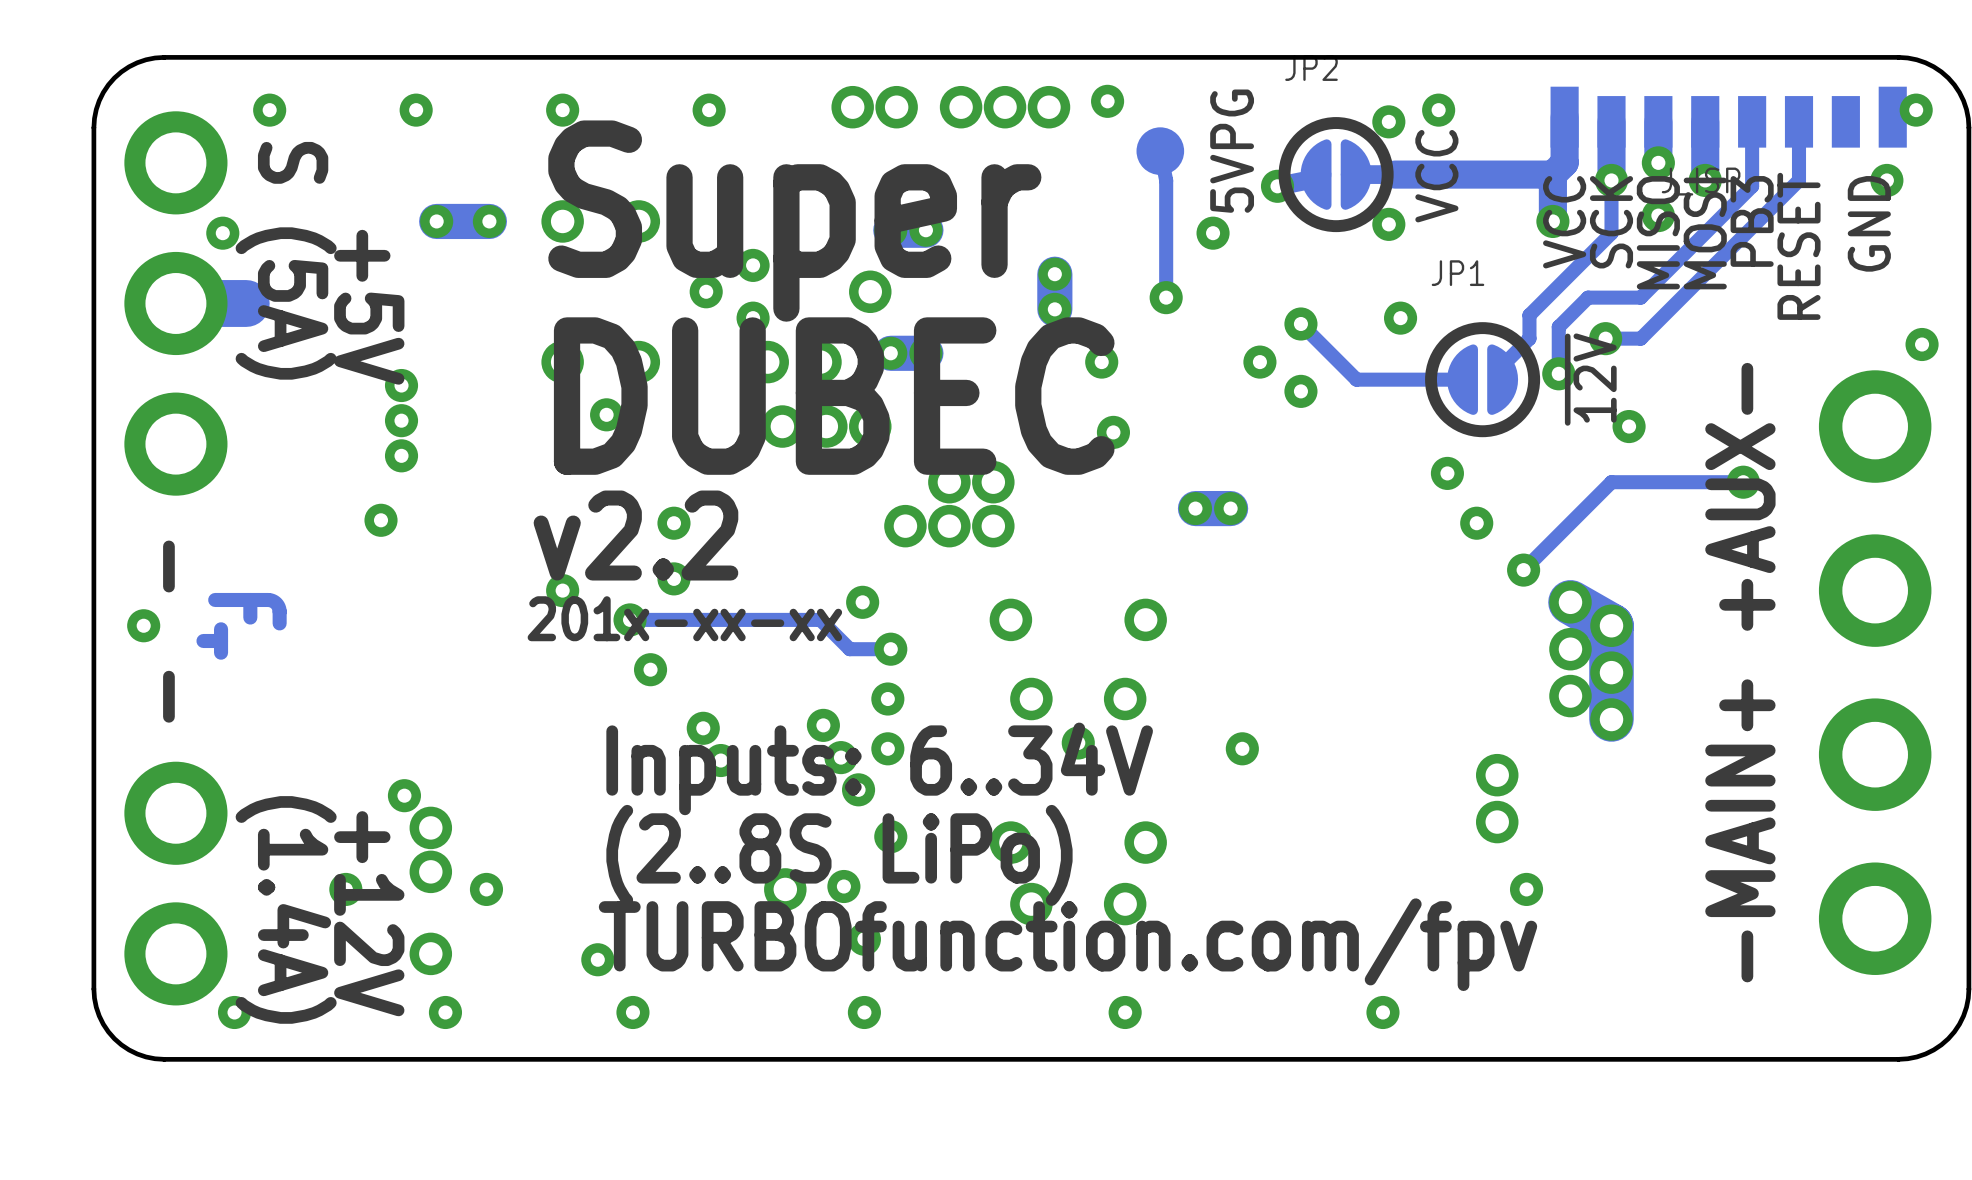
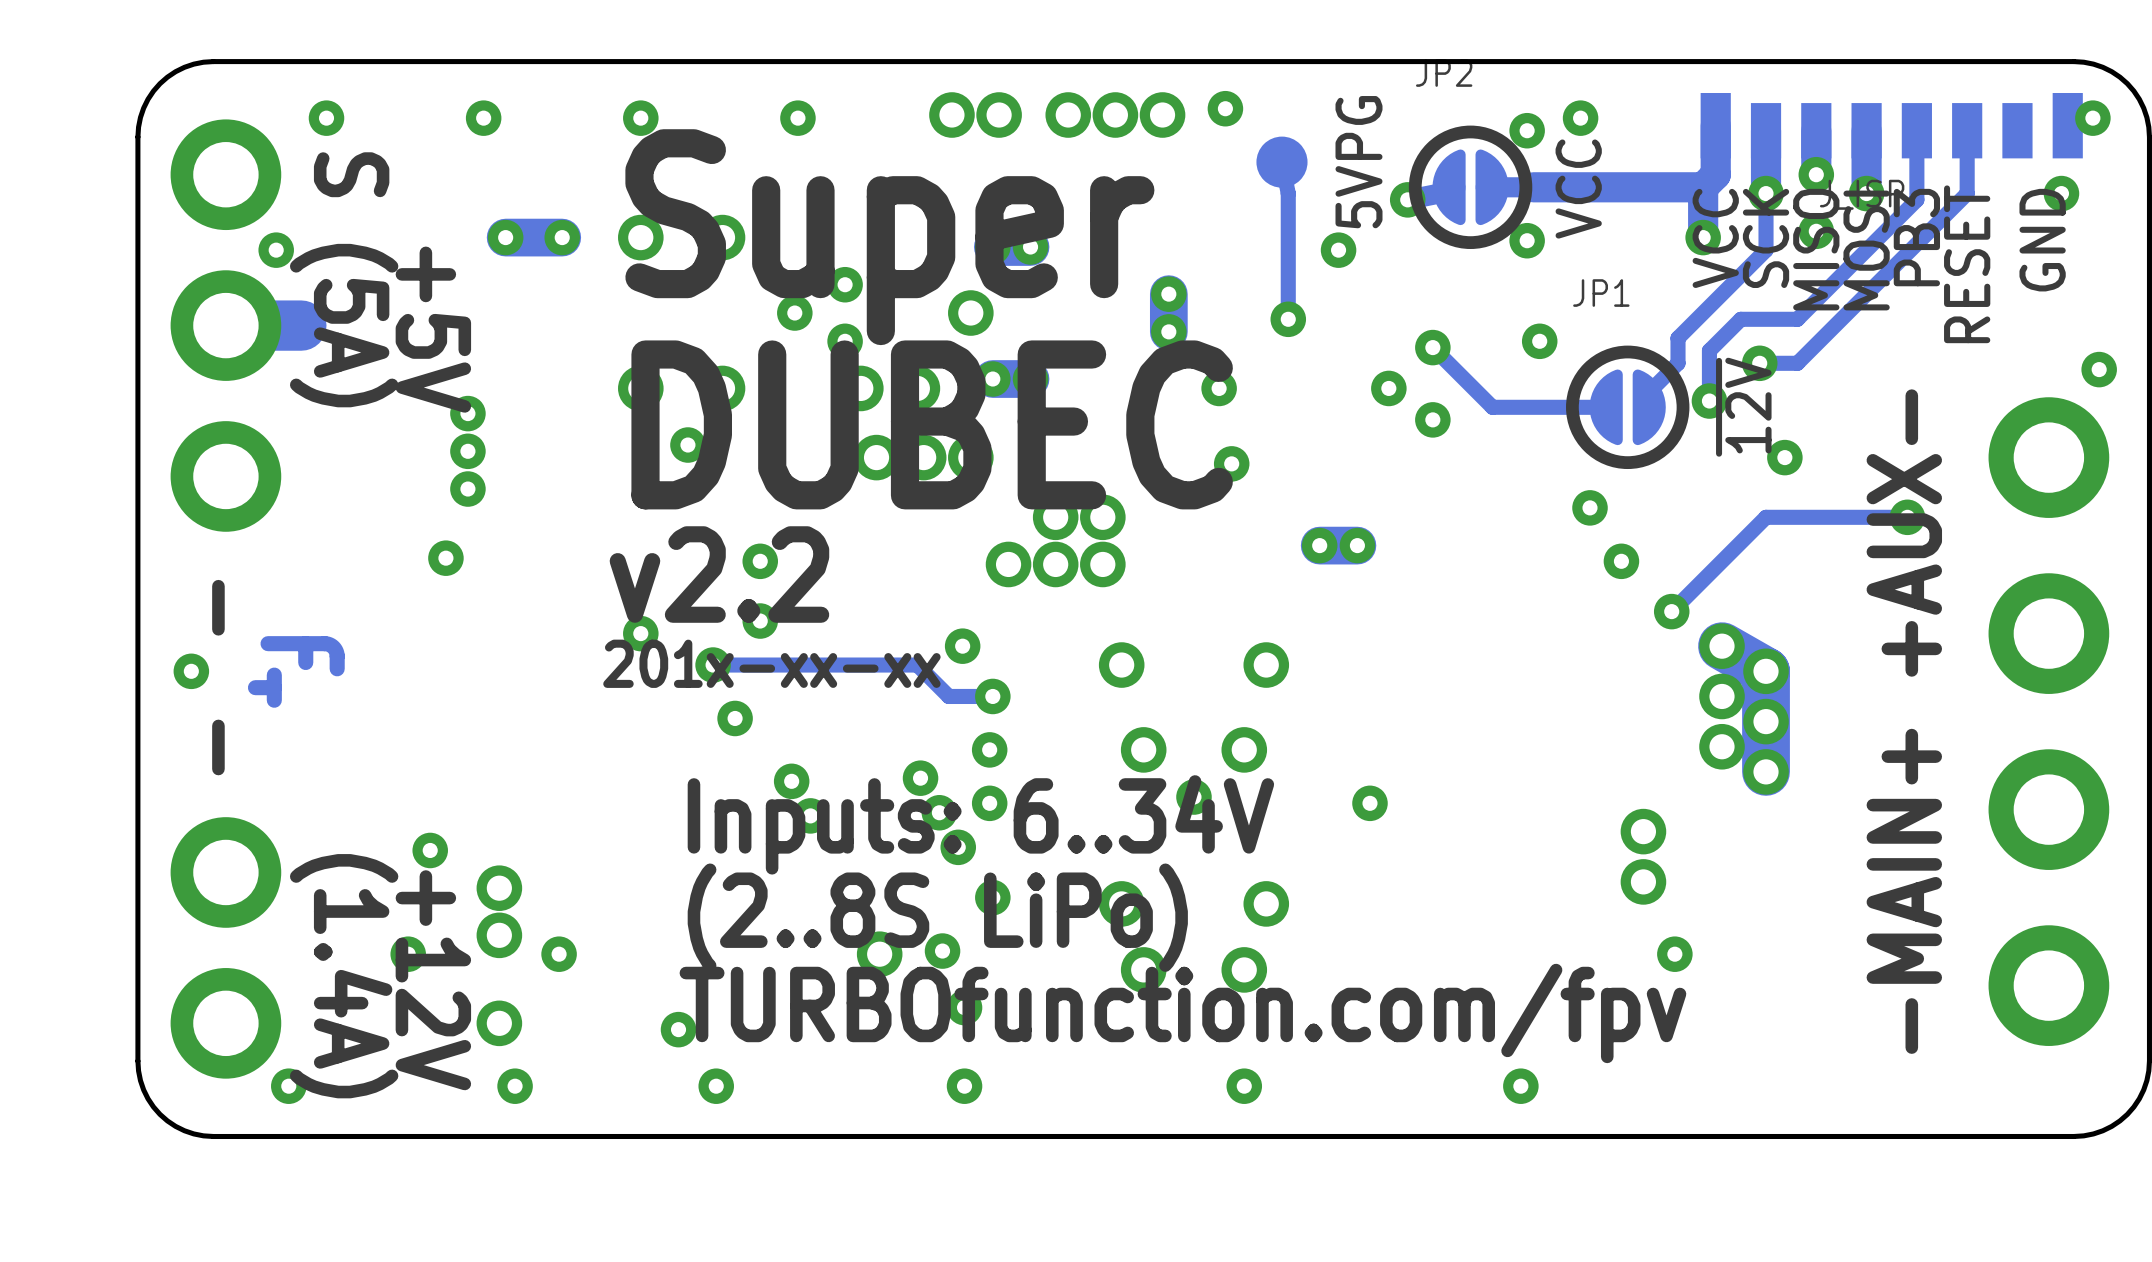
via position: (404, 795) -> (430, 850)

